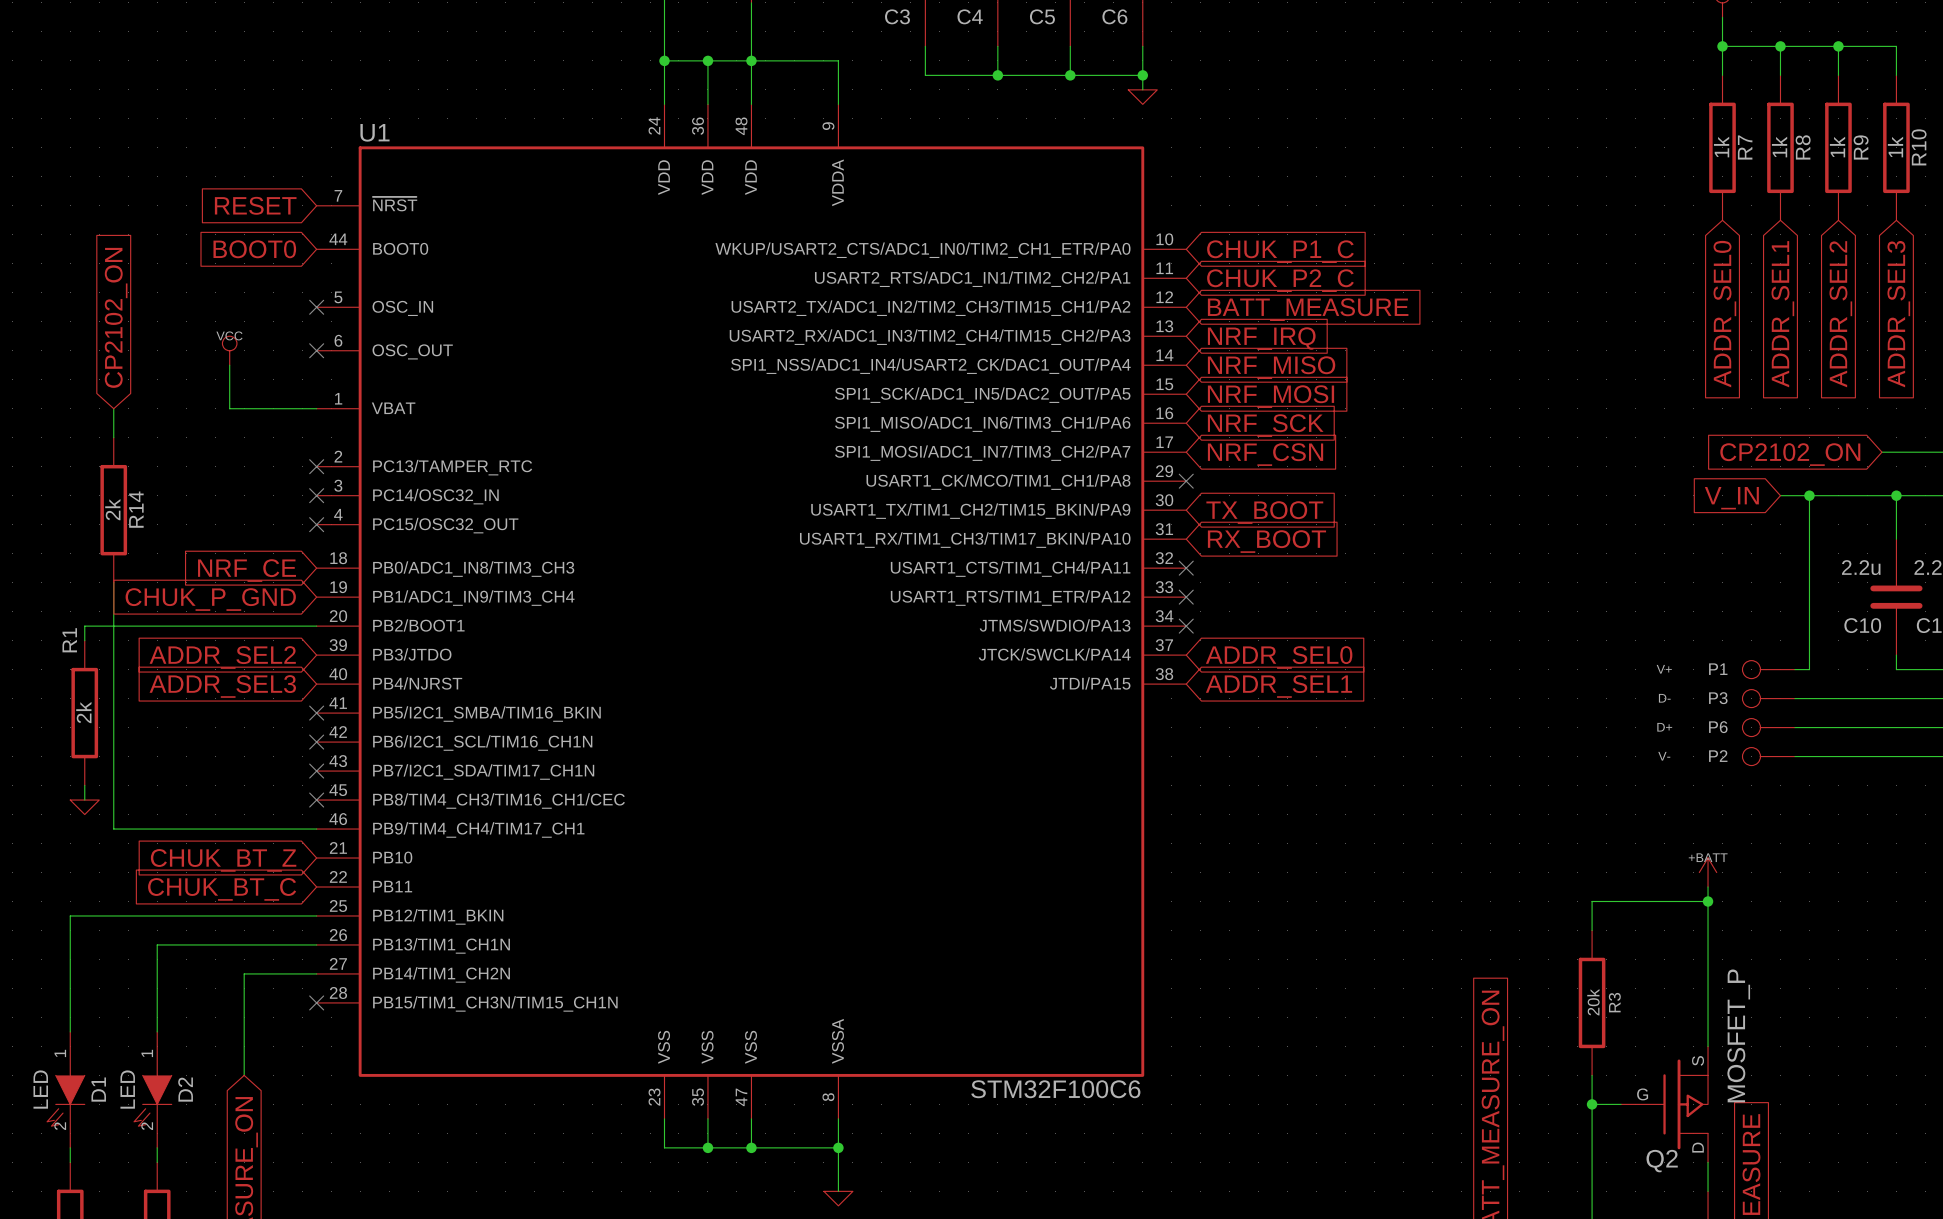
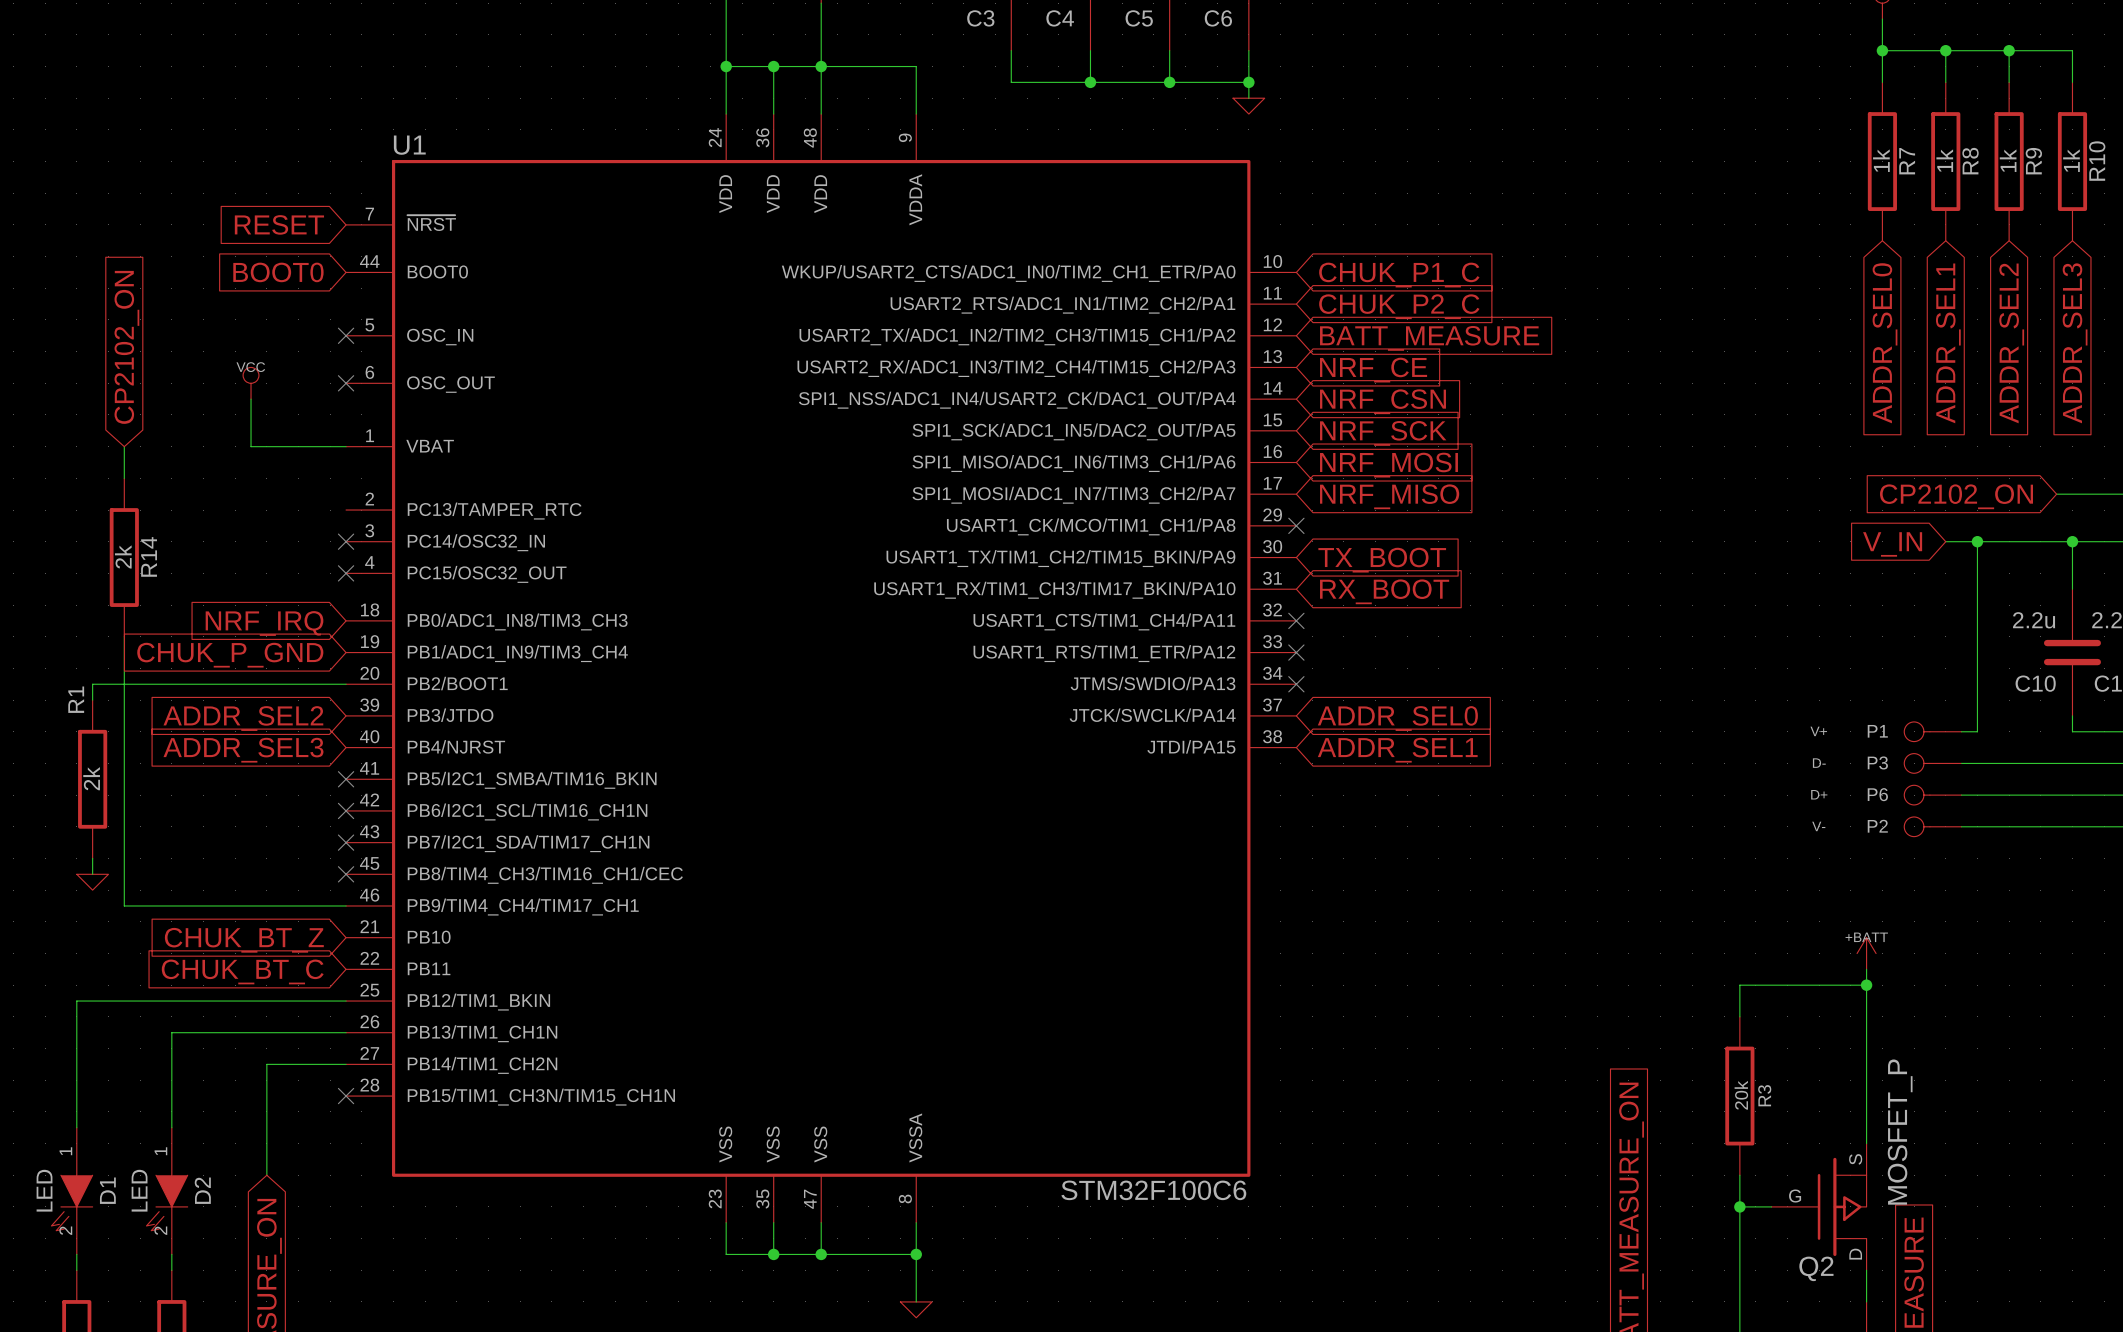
global label: NRF_IRQ (1261, 338) -> NRF_CE (1373, 370)
global label: NRF_MISO (1271, 367) -> NRF_CSN (1383, 401)
global label: NRF_MOSI (1271, 396) -> NRF_SCK (1383, 433)
global label: NRF_SCK (1265, 425) -> NRF_MOSI (1388, 465)
global label: NRF_CSN (1265, 454) -> NRF_MISO (1389, 496)
no-connect mark: (316, 466) -> none
global label: NRF_CE (247, 570) -> NRF_IRQ (264, 623)

